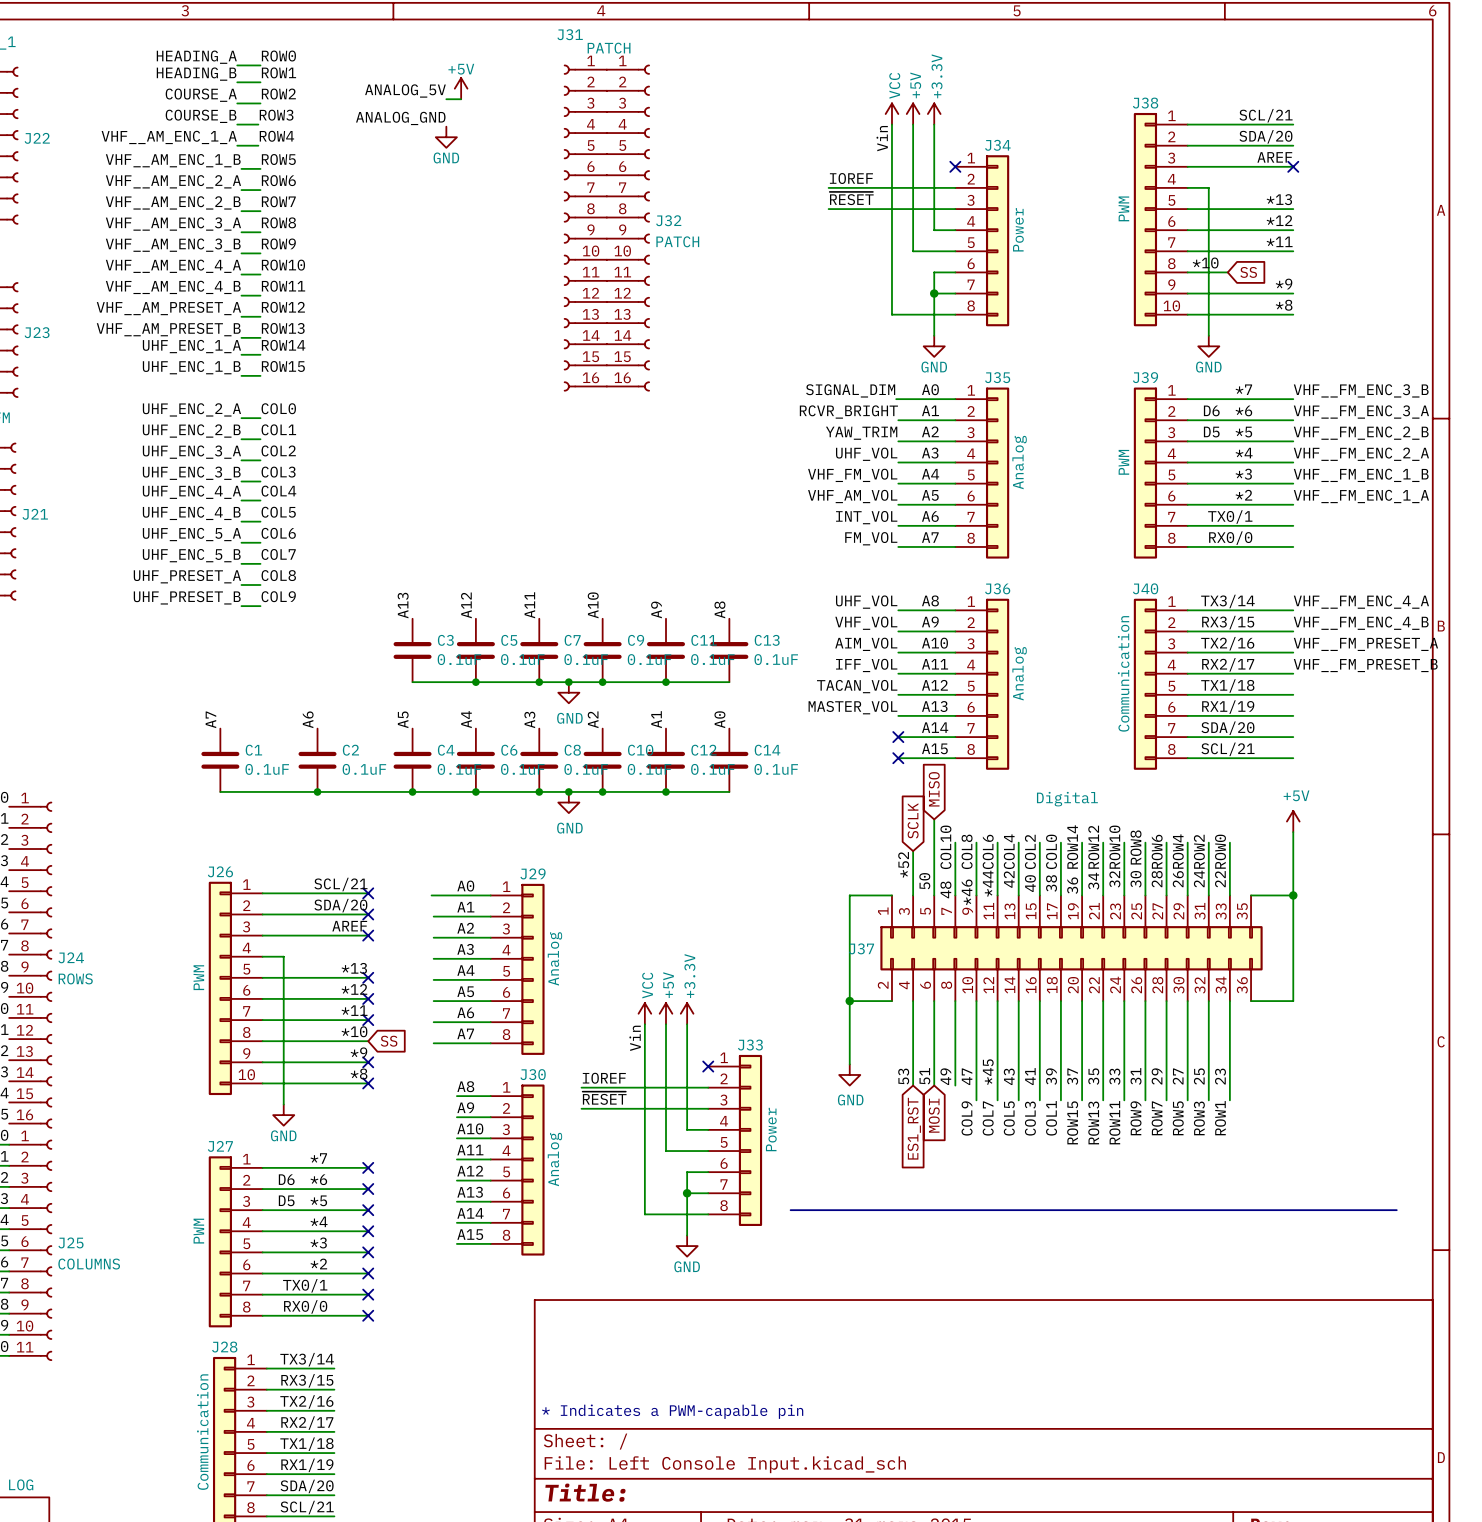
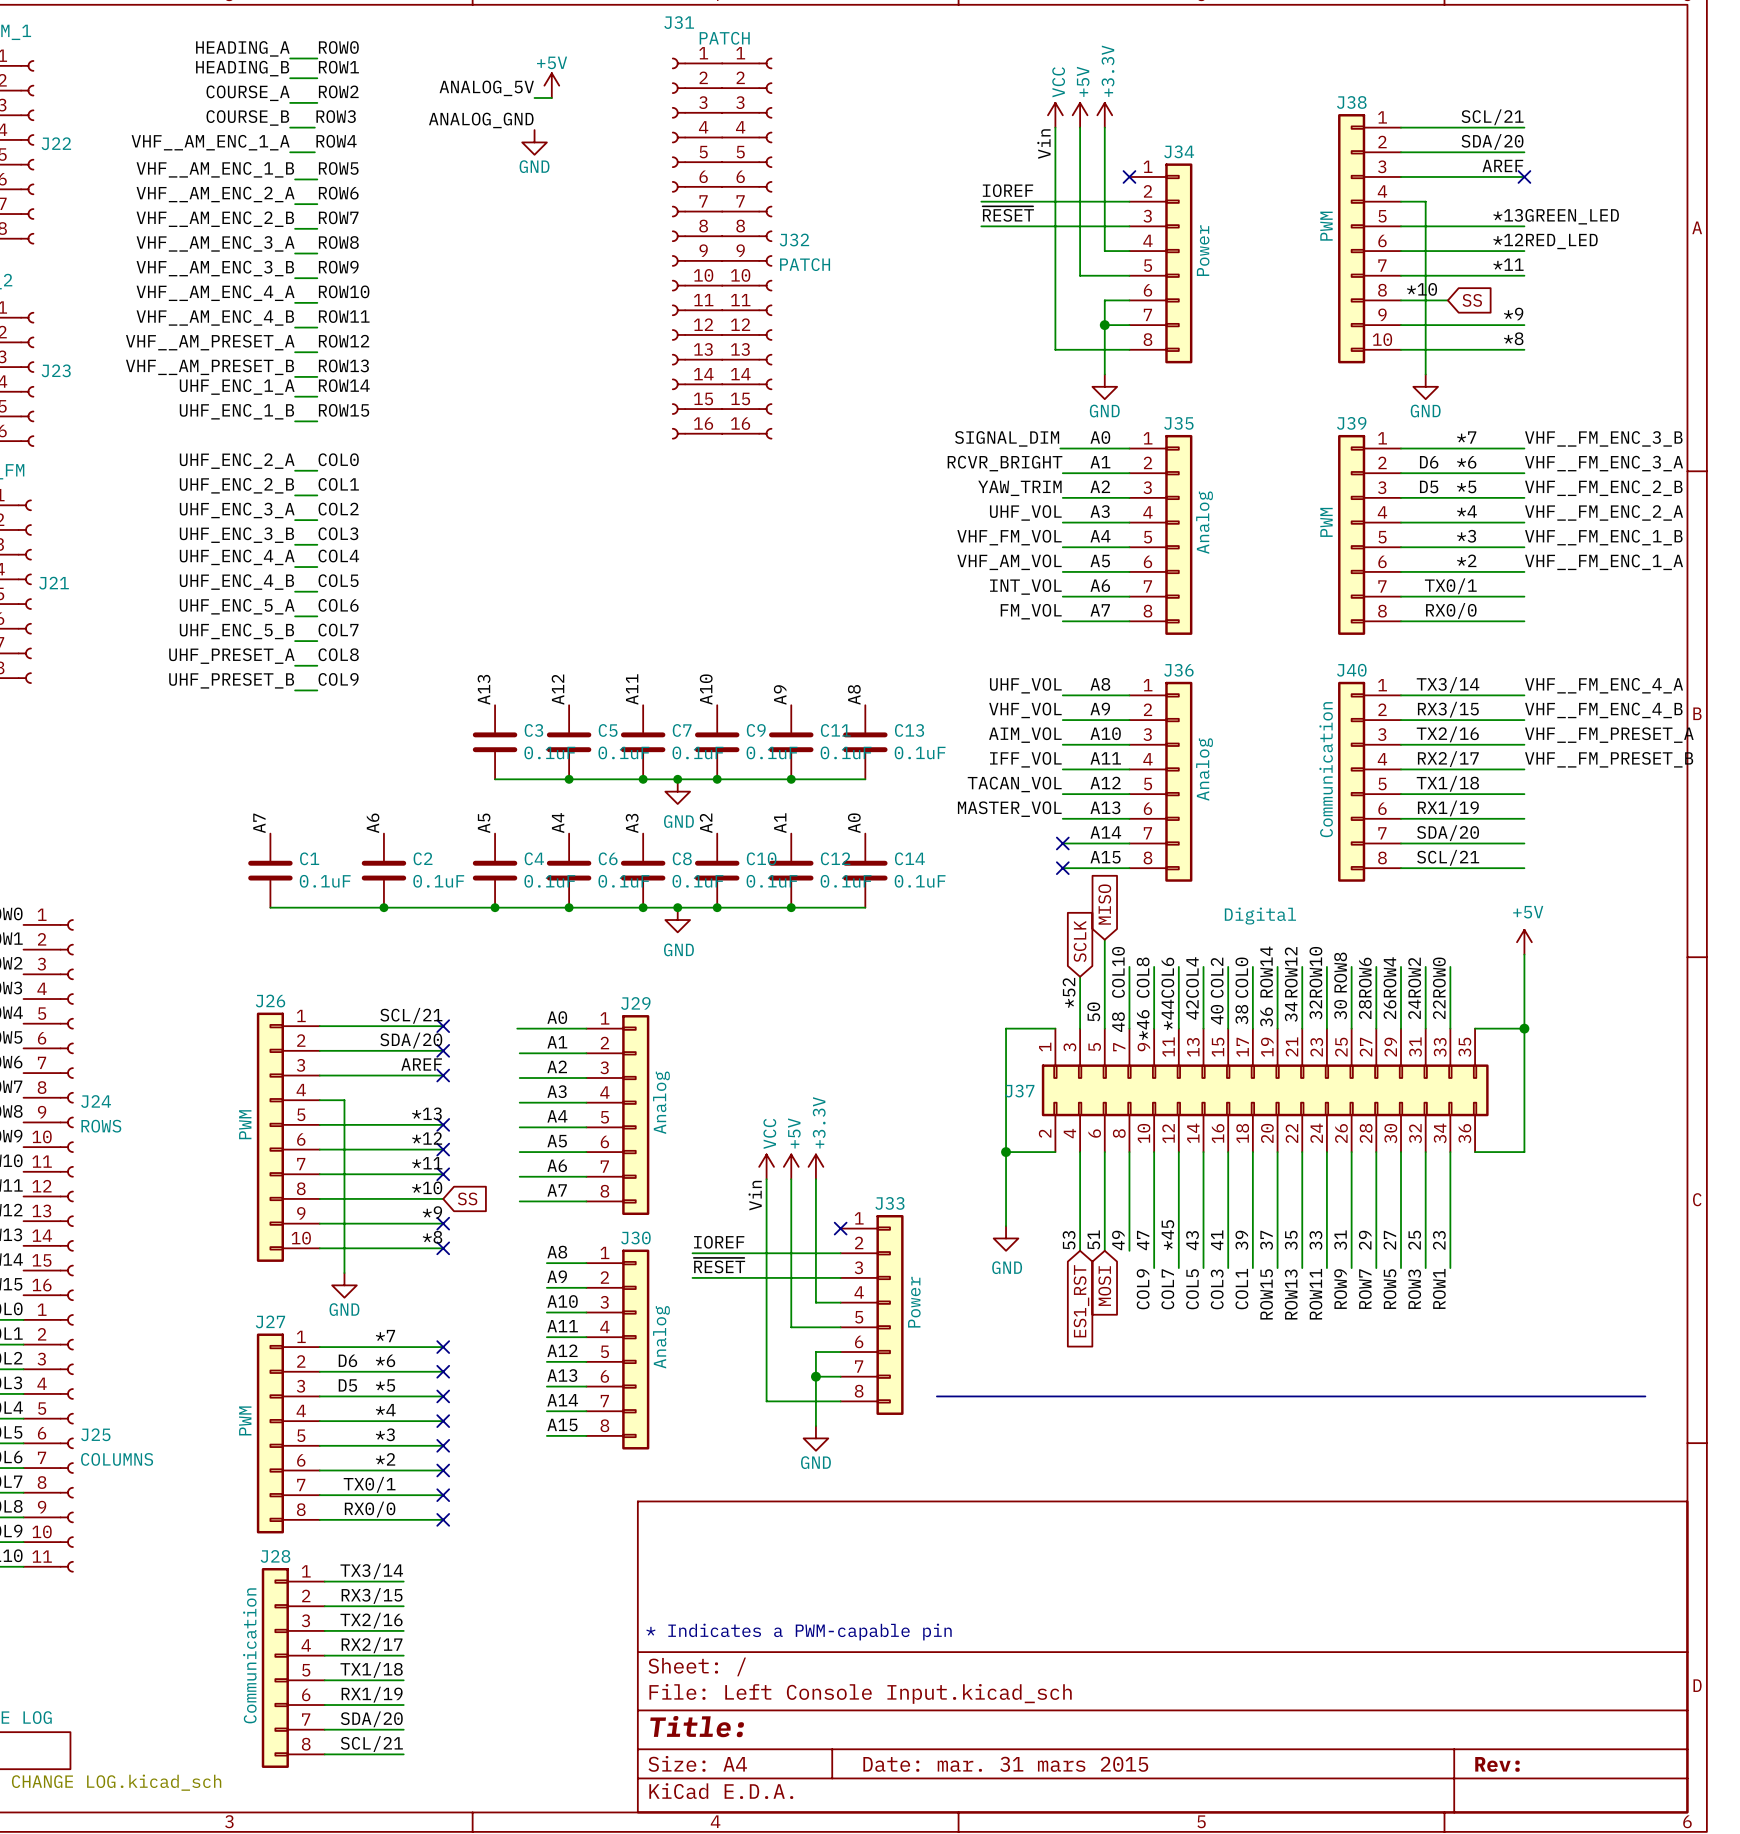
label: none -> GREEN_LED (1572, 216)
label: none -> RED_LED (1561, 241)

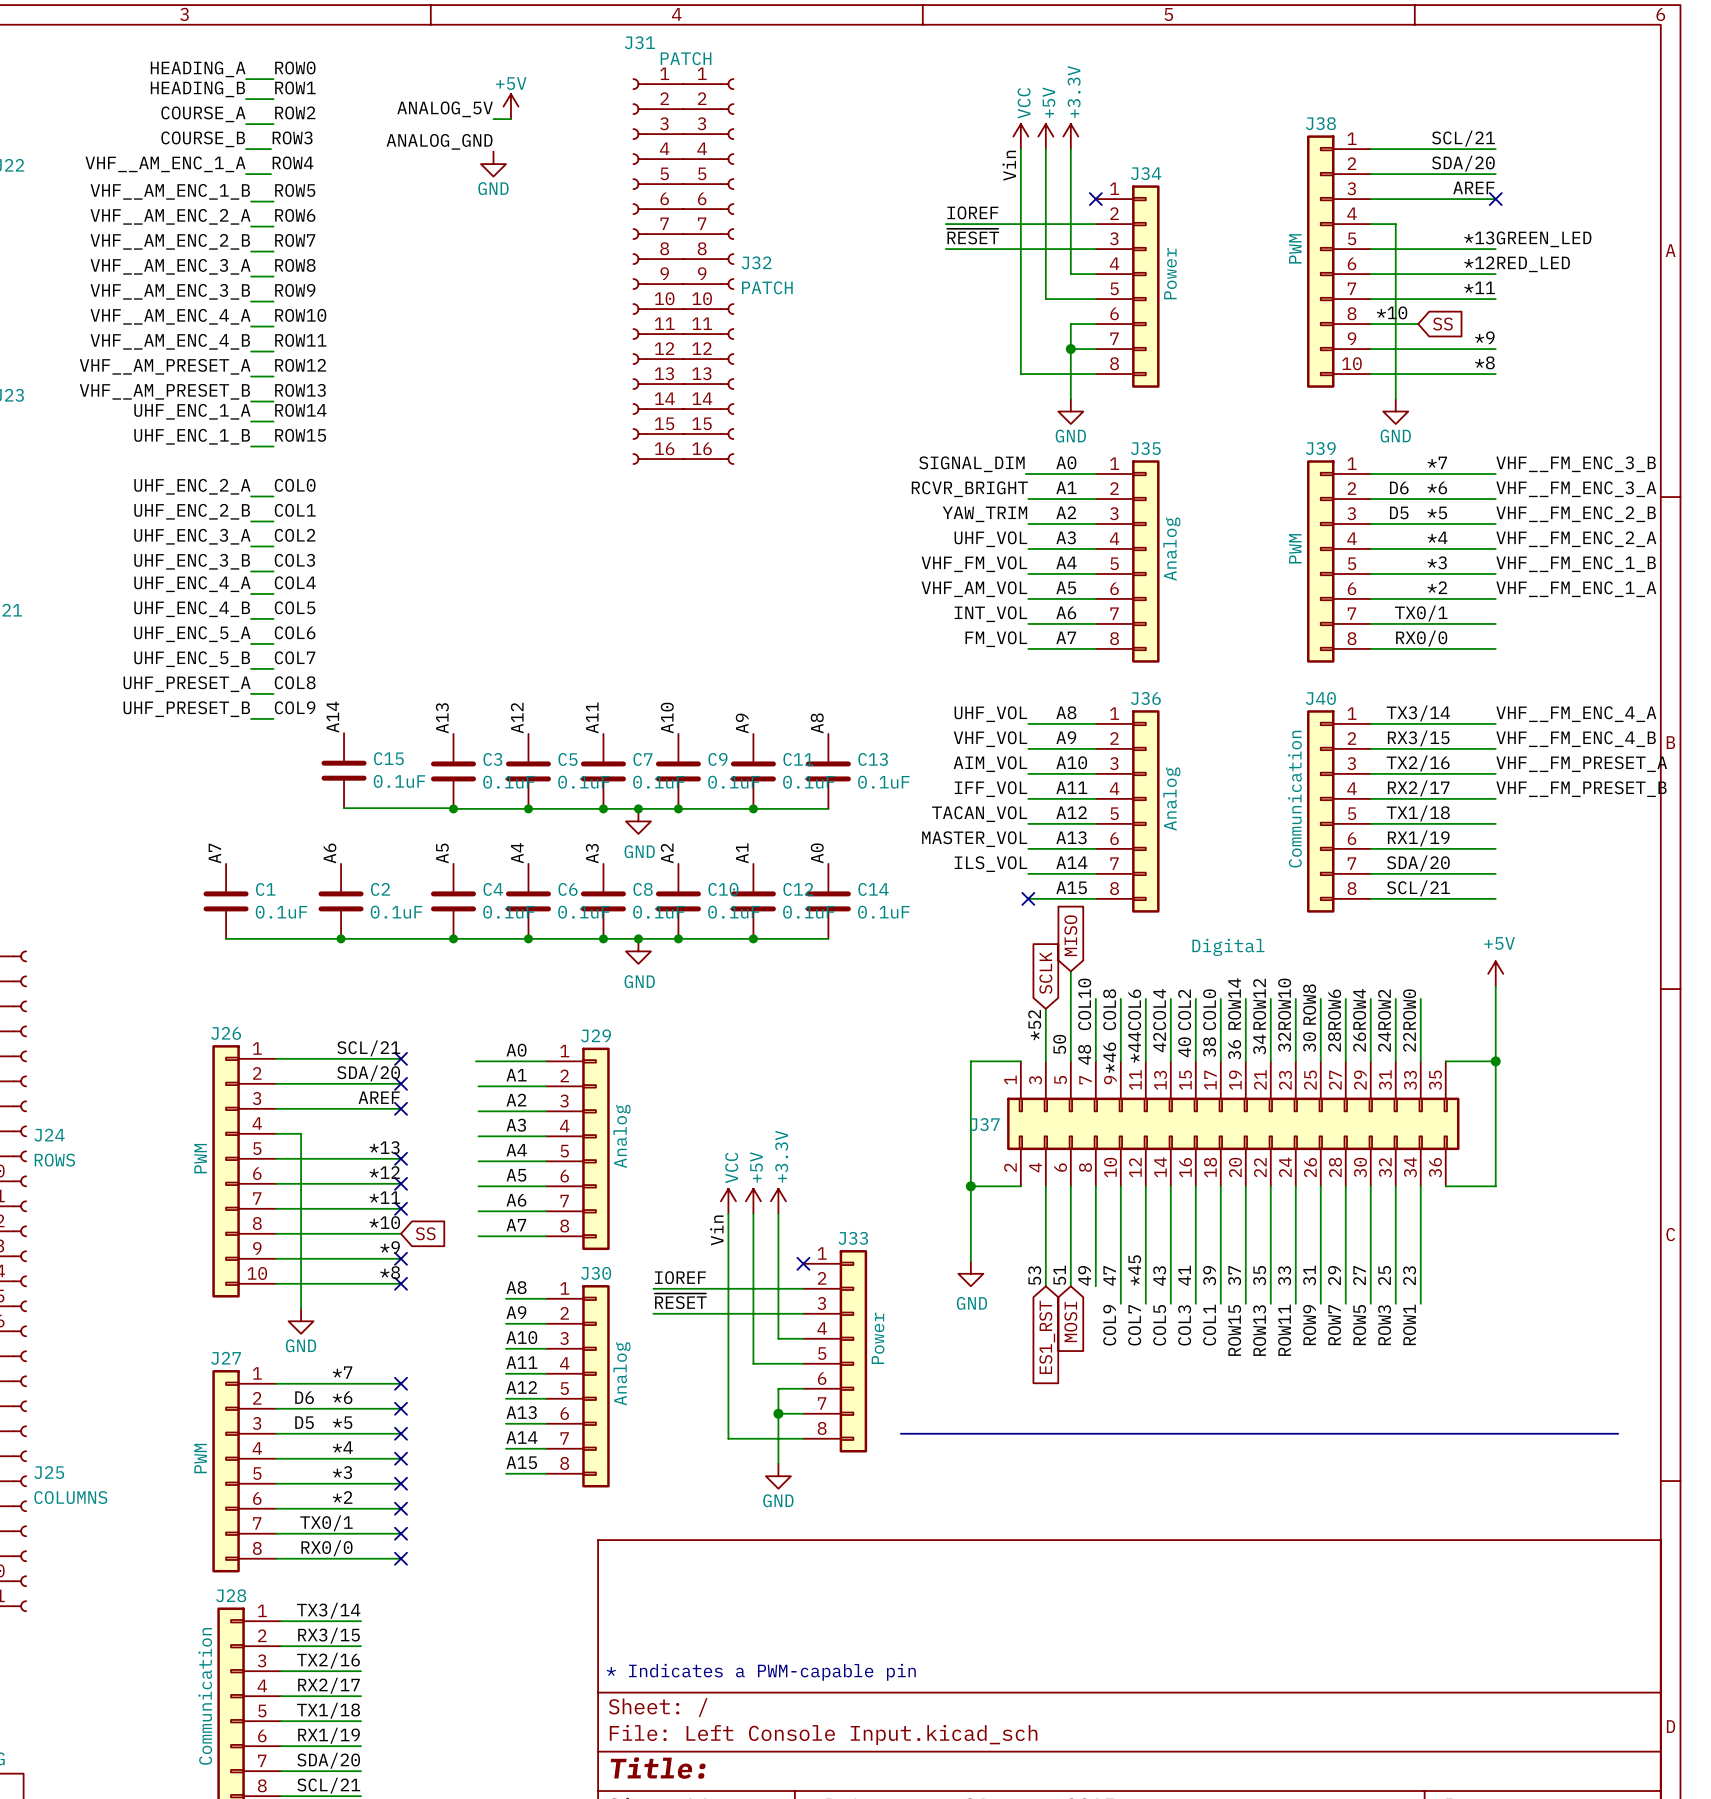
label: none -> A14 (332, 717)
C15: none -> 0.1uF (344, 770)
wire: none -> (344, 808) (453, 808)
junction: none -> (453, 808)
label: none -> ILS_VOL (990, 864)
no-connect mark: (1062, 843) -> none

